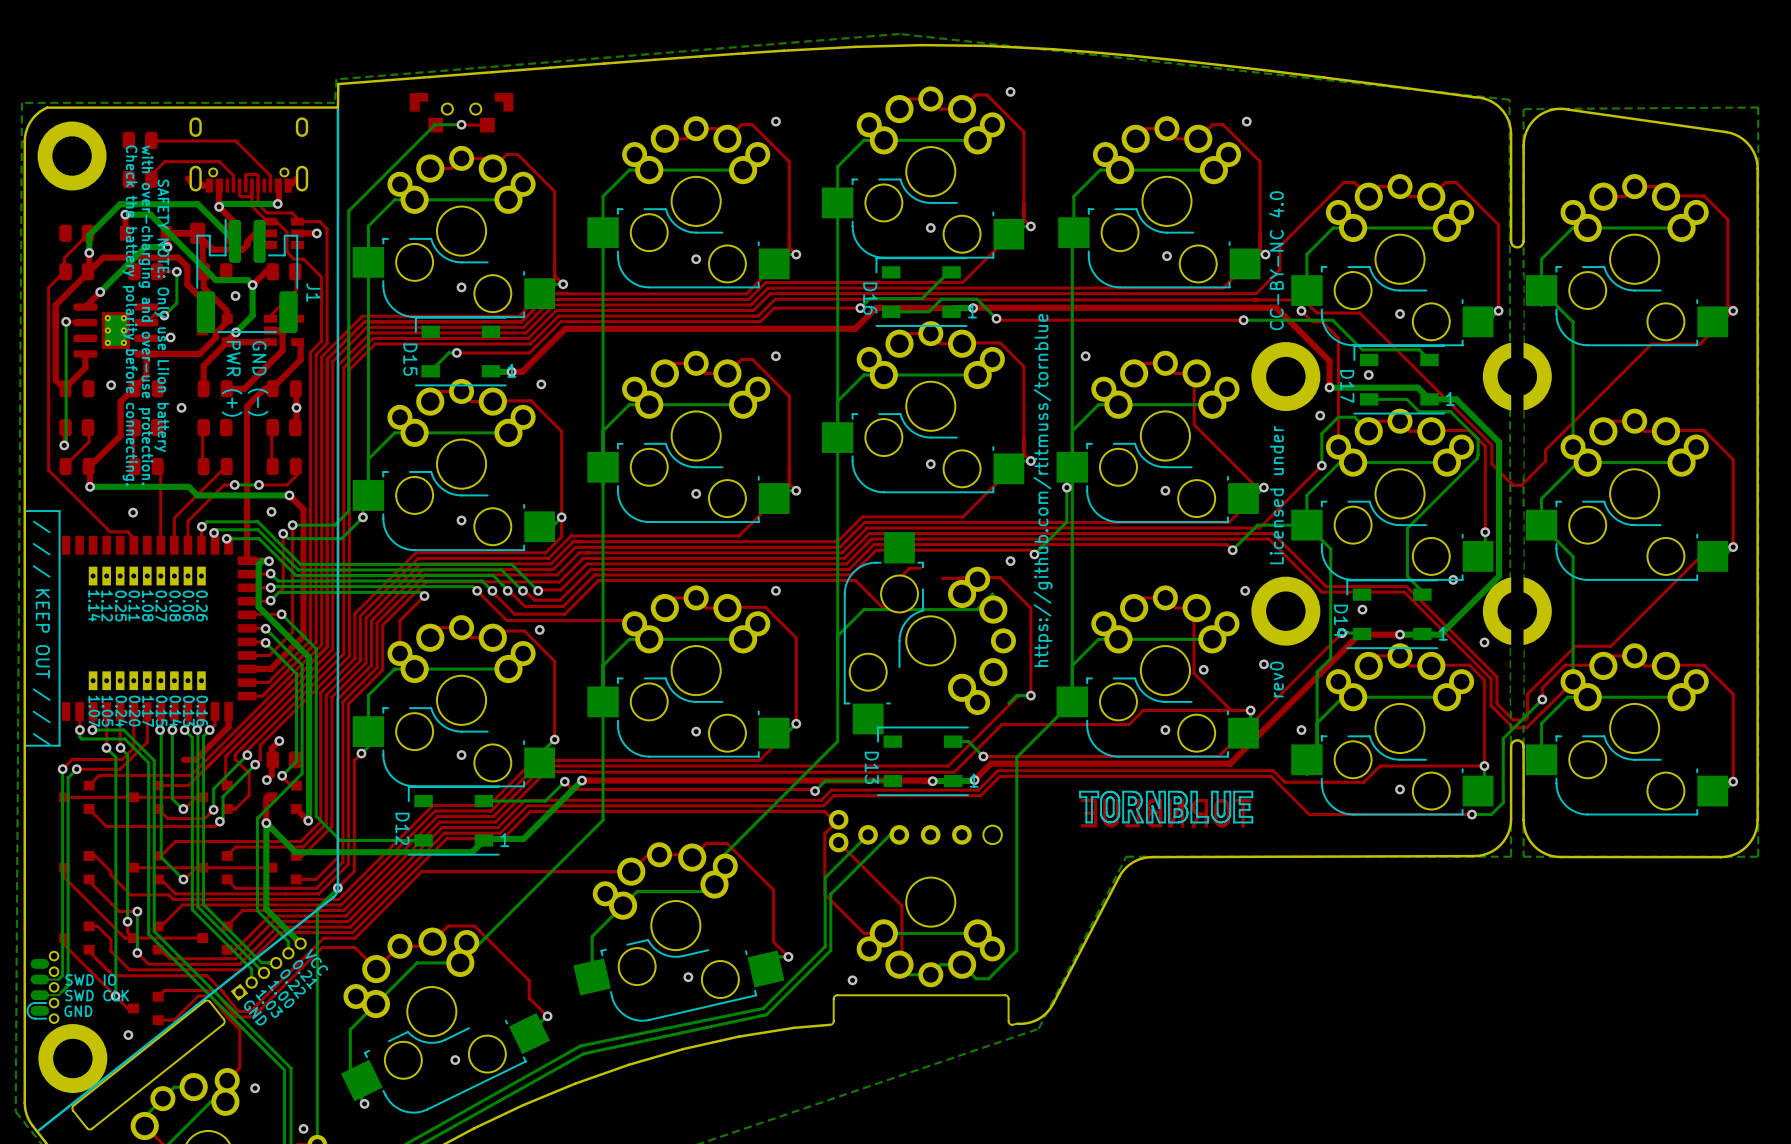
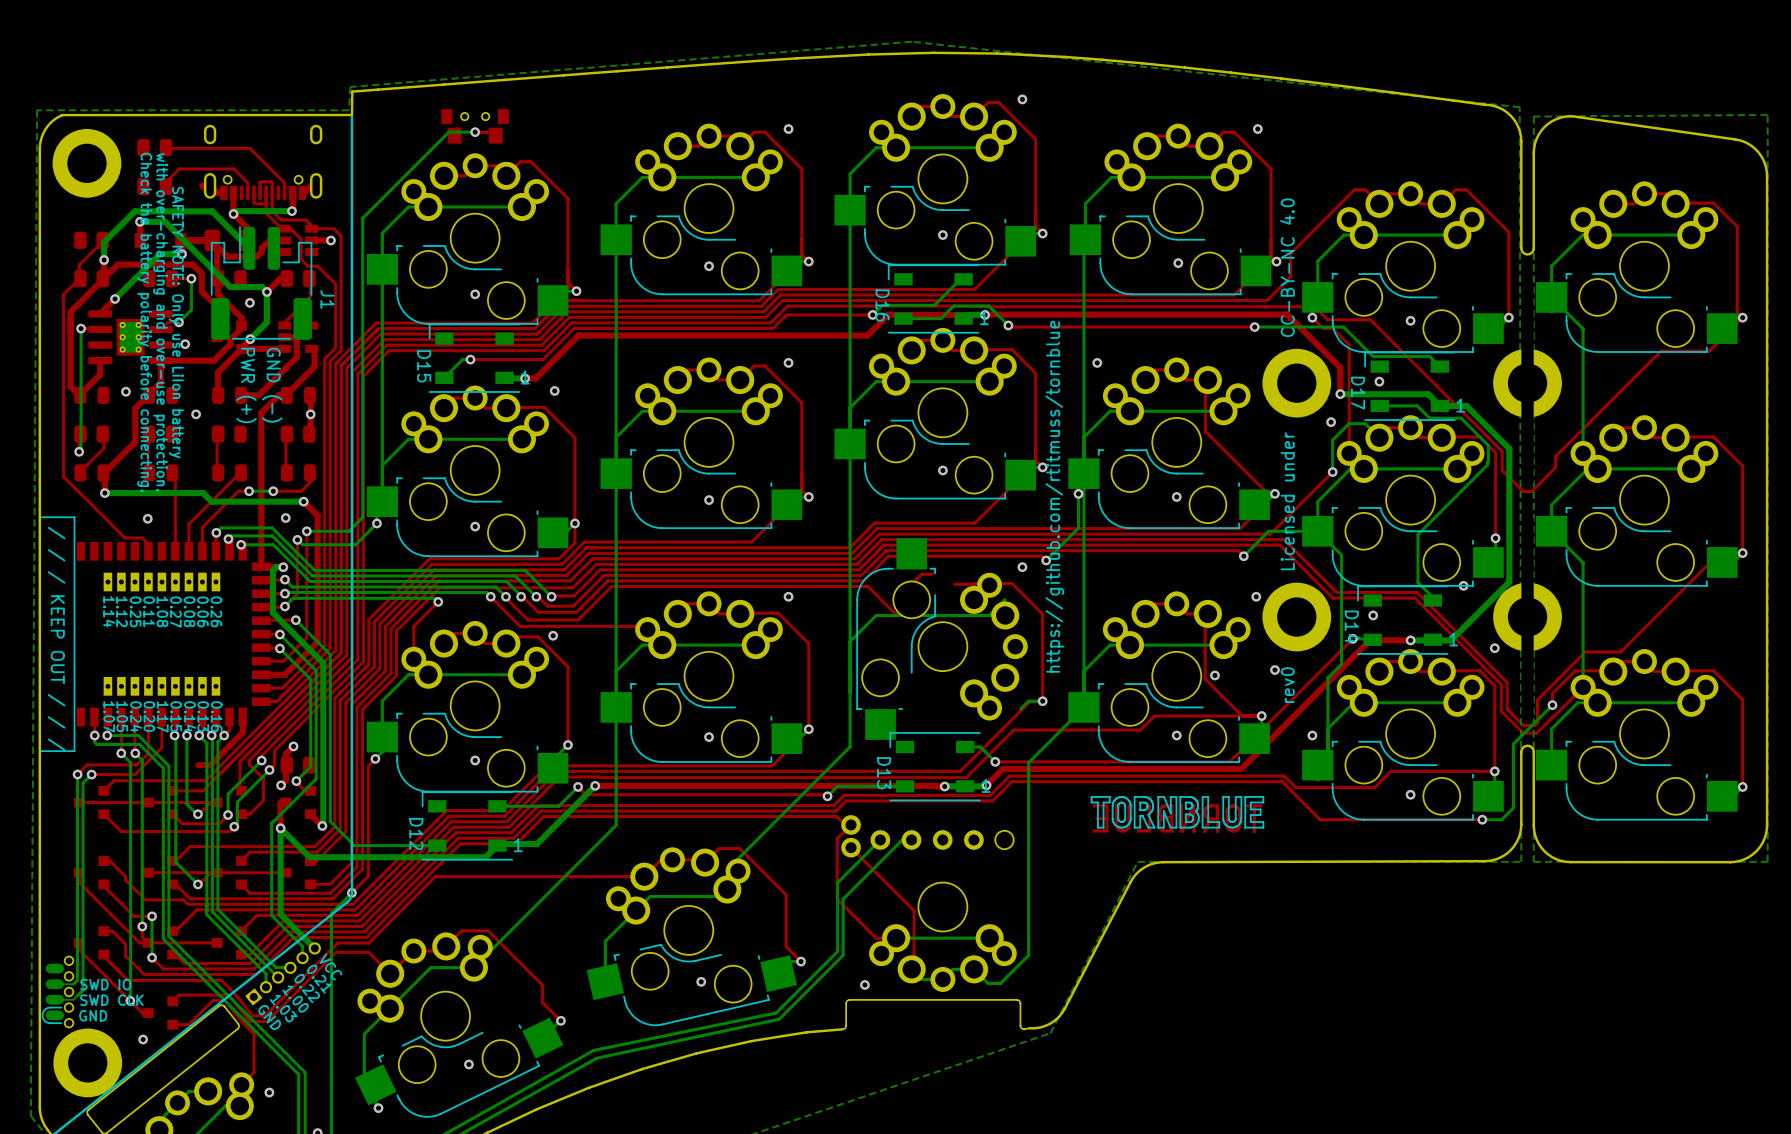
part footprint: [409, 93, 514, 133] -> [441, 109, 509, 144]

